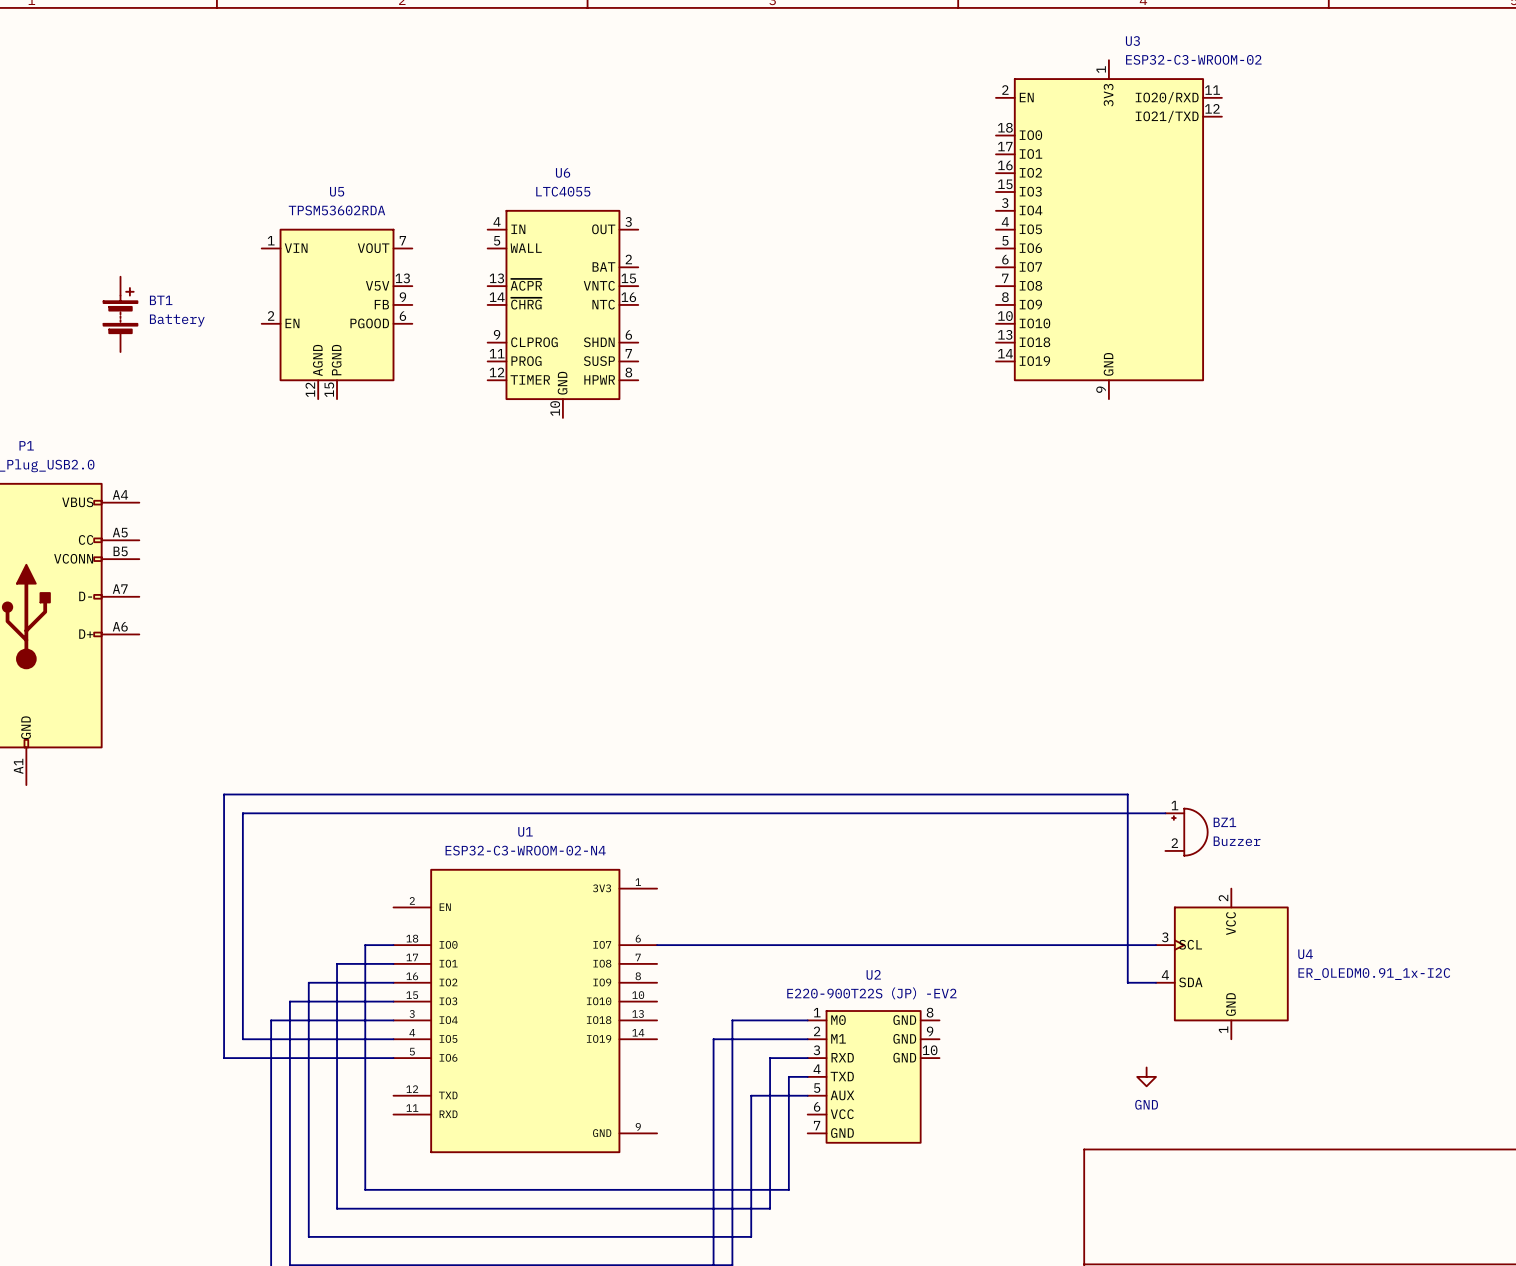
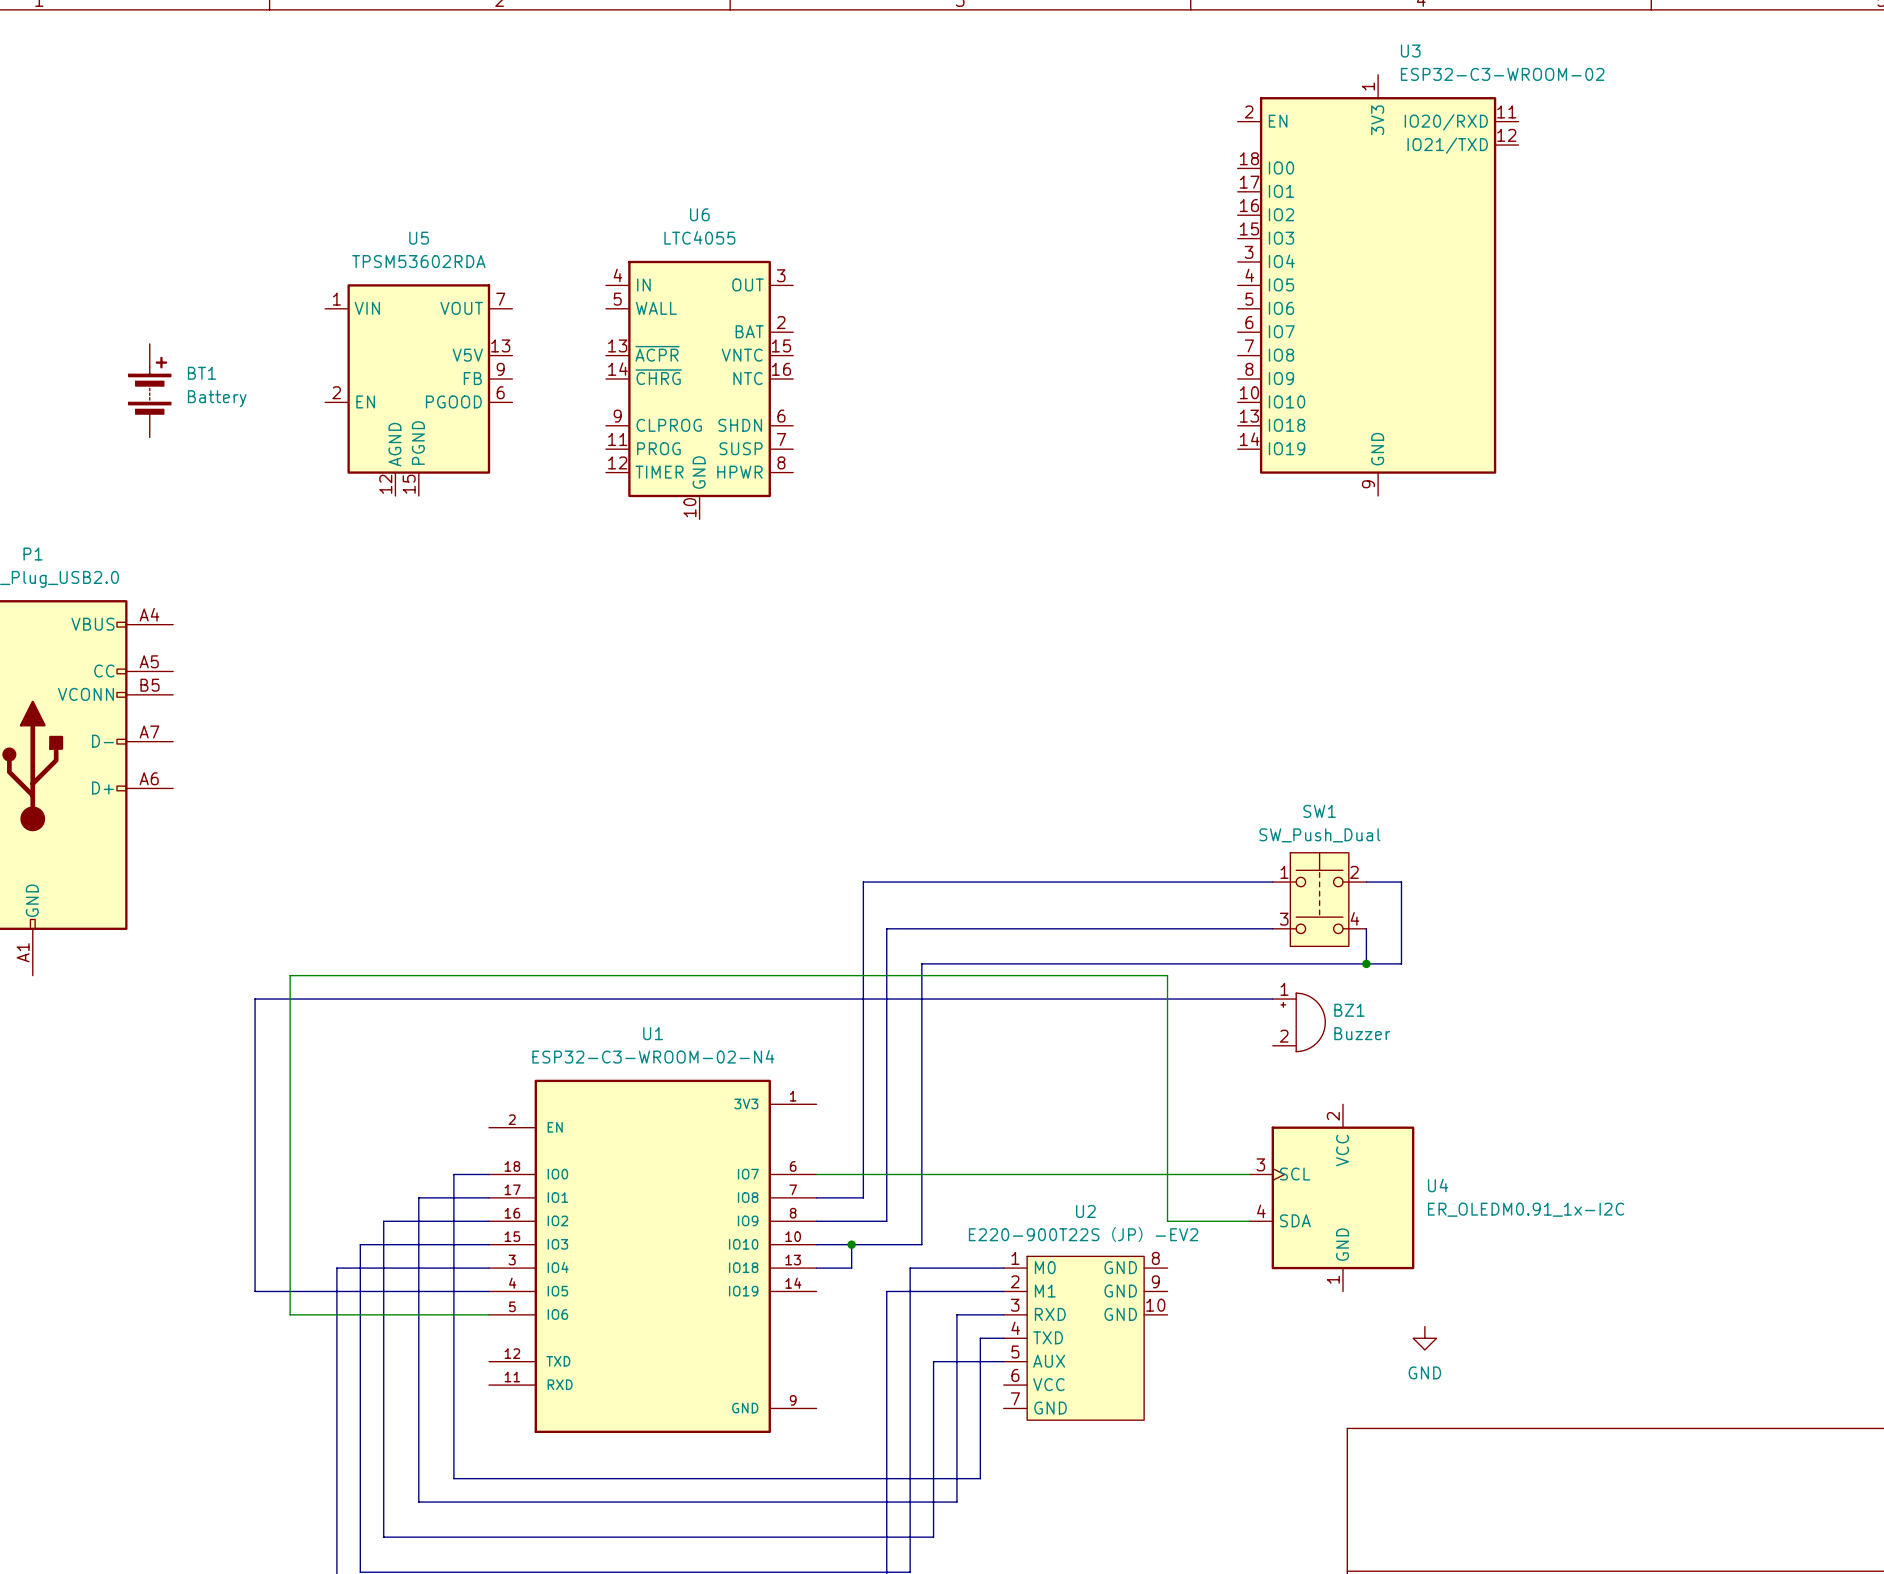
bus: none -> (1272, 882) (863, 882) (863, 1197) (816, 1197)
bus: none -> (1366, 882) (1401, 882) (1401, 963) (921, 963) (921, 1244) (816, 1244)
SW1: none -> SW_Push_Dual (1319, 899)
bus: none -> (1272, 928) (886, 928) (886, 1221) (816, 1221)
bus: none -> (1366, 928) (1366, 963)
junction: none -> (1366, 963)
bus: (1165, 813) (242, 813) (242, 1039) -> (1272, 999) (255, 999) (255, 1291) (301, 1291)
BZ1 position: (1186, 832) -> (1299, 1022)
bus: (657, 945) (1156, 945) -> none
U4 position: (1222, 963) -> (1331, 1197)
wire: (1156, 982) (1127, 982) (1127, 794) (224, 794) (224, 1058) (233, 1058) -> (1249, 1221) (1167, 1221) (1167, 975) (290, 975) (290, 1314)
bus: none -> (851, 1244) (851, 1268) (816, 1268)
junction: none -> (851, 1244)

